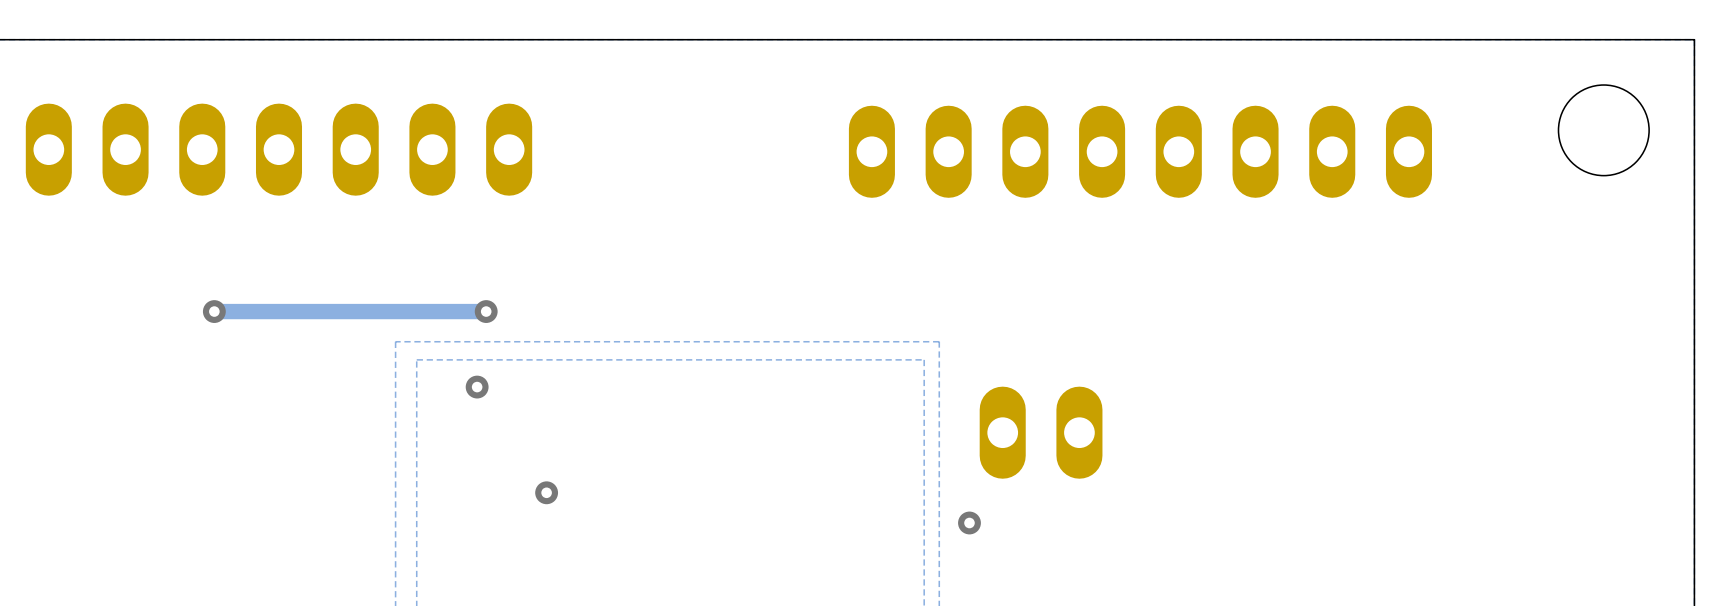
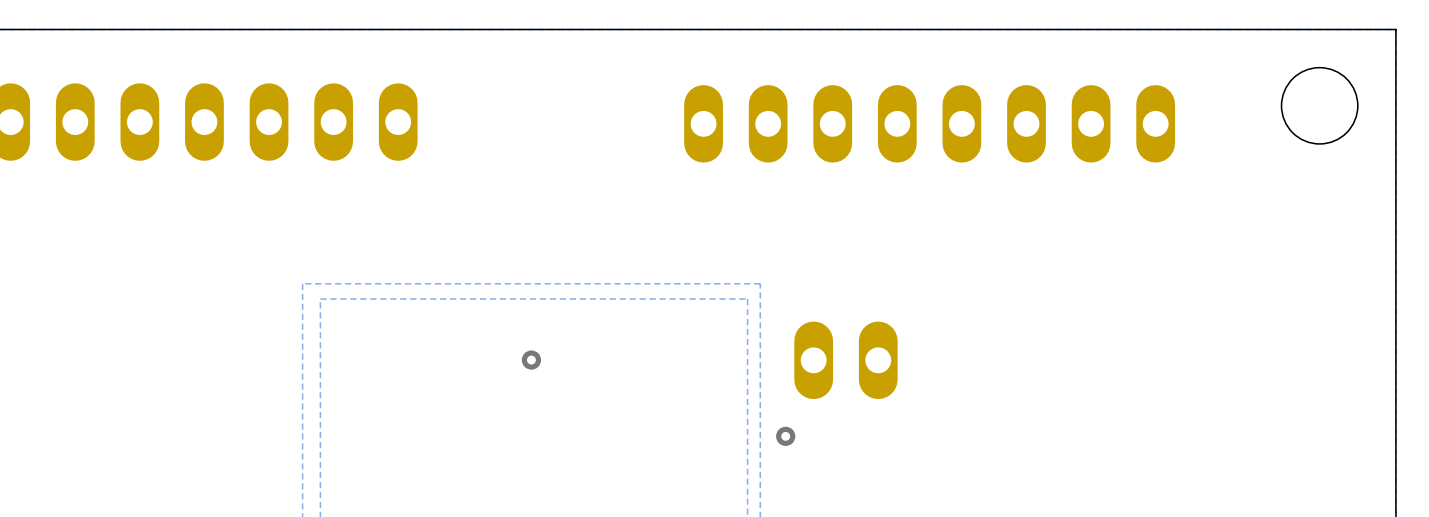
via: (214, 311) -> none
track: (486, 311) (214, 311) -> none
via: (486, 311) -> none
via: (477, 387) -> none
via: none -> (531, 360)
via: (546, 492) -> none

